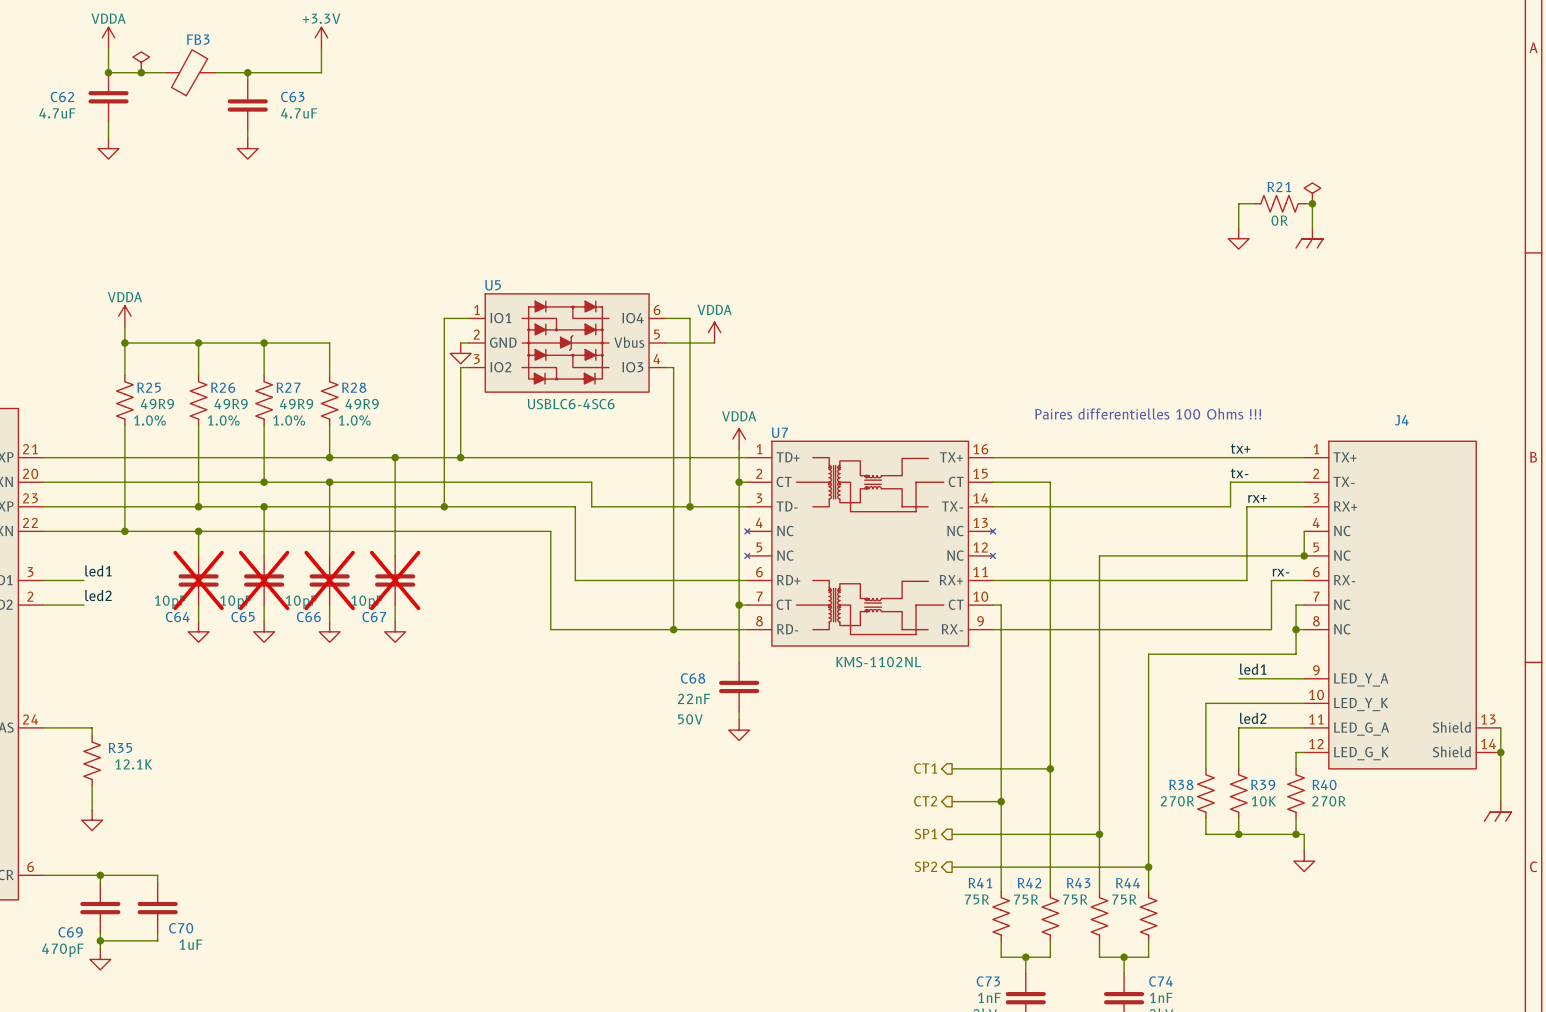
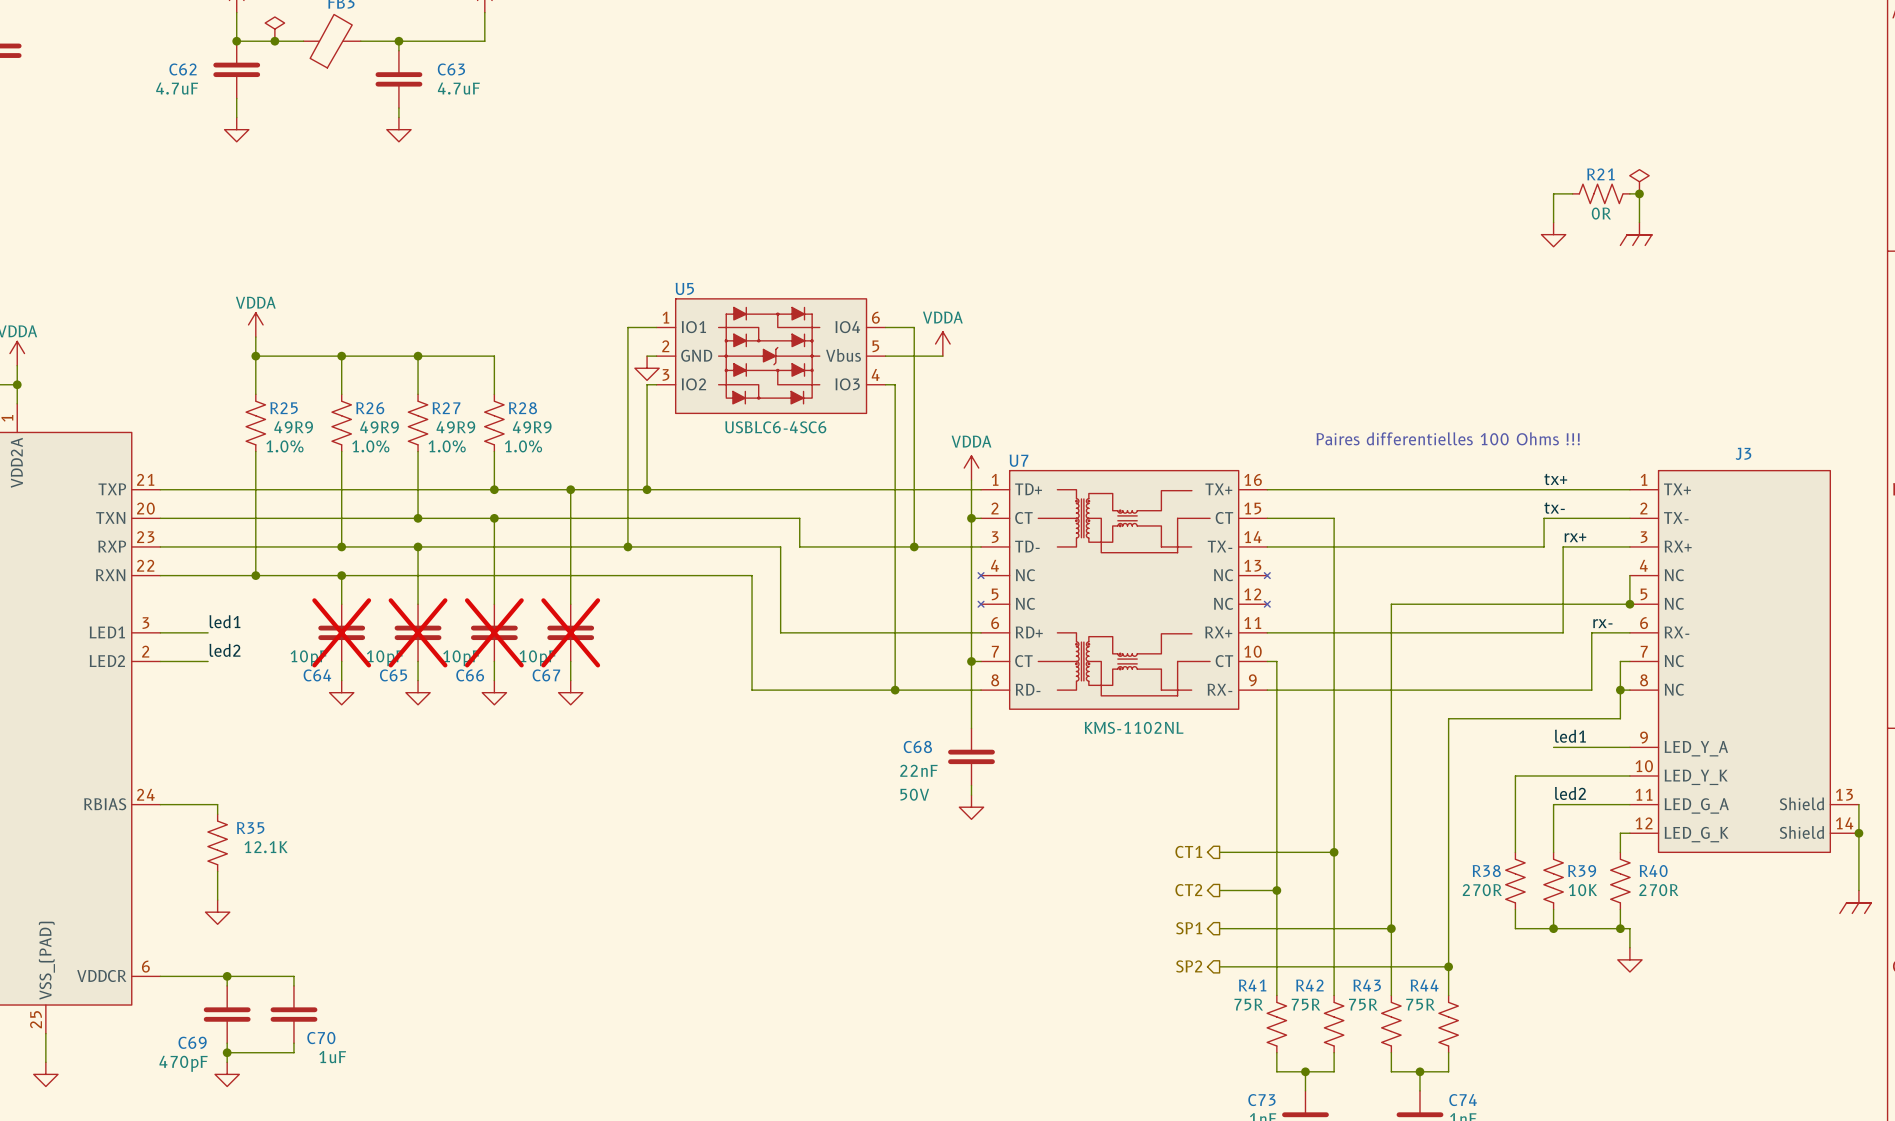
J4 name: J4 (1401, 420) -> J3 (1743, 453)

